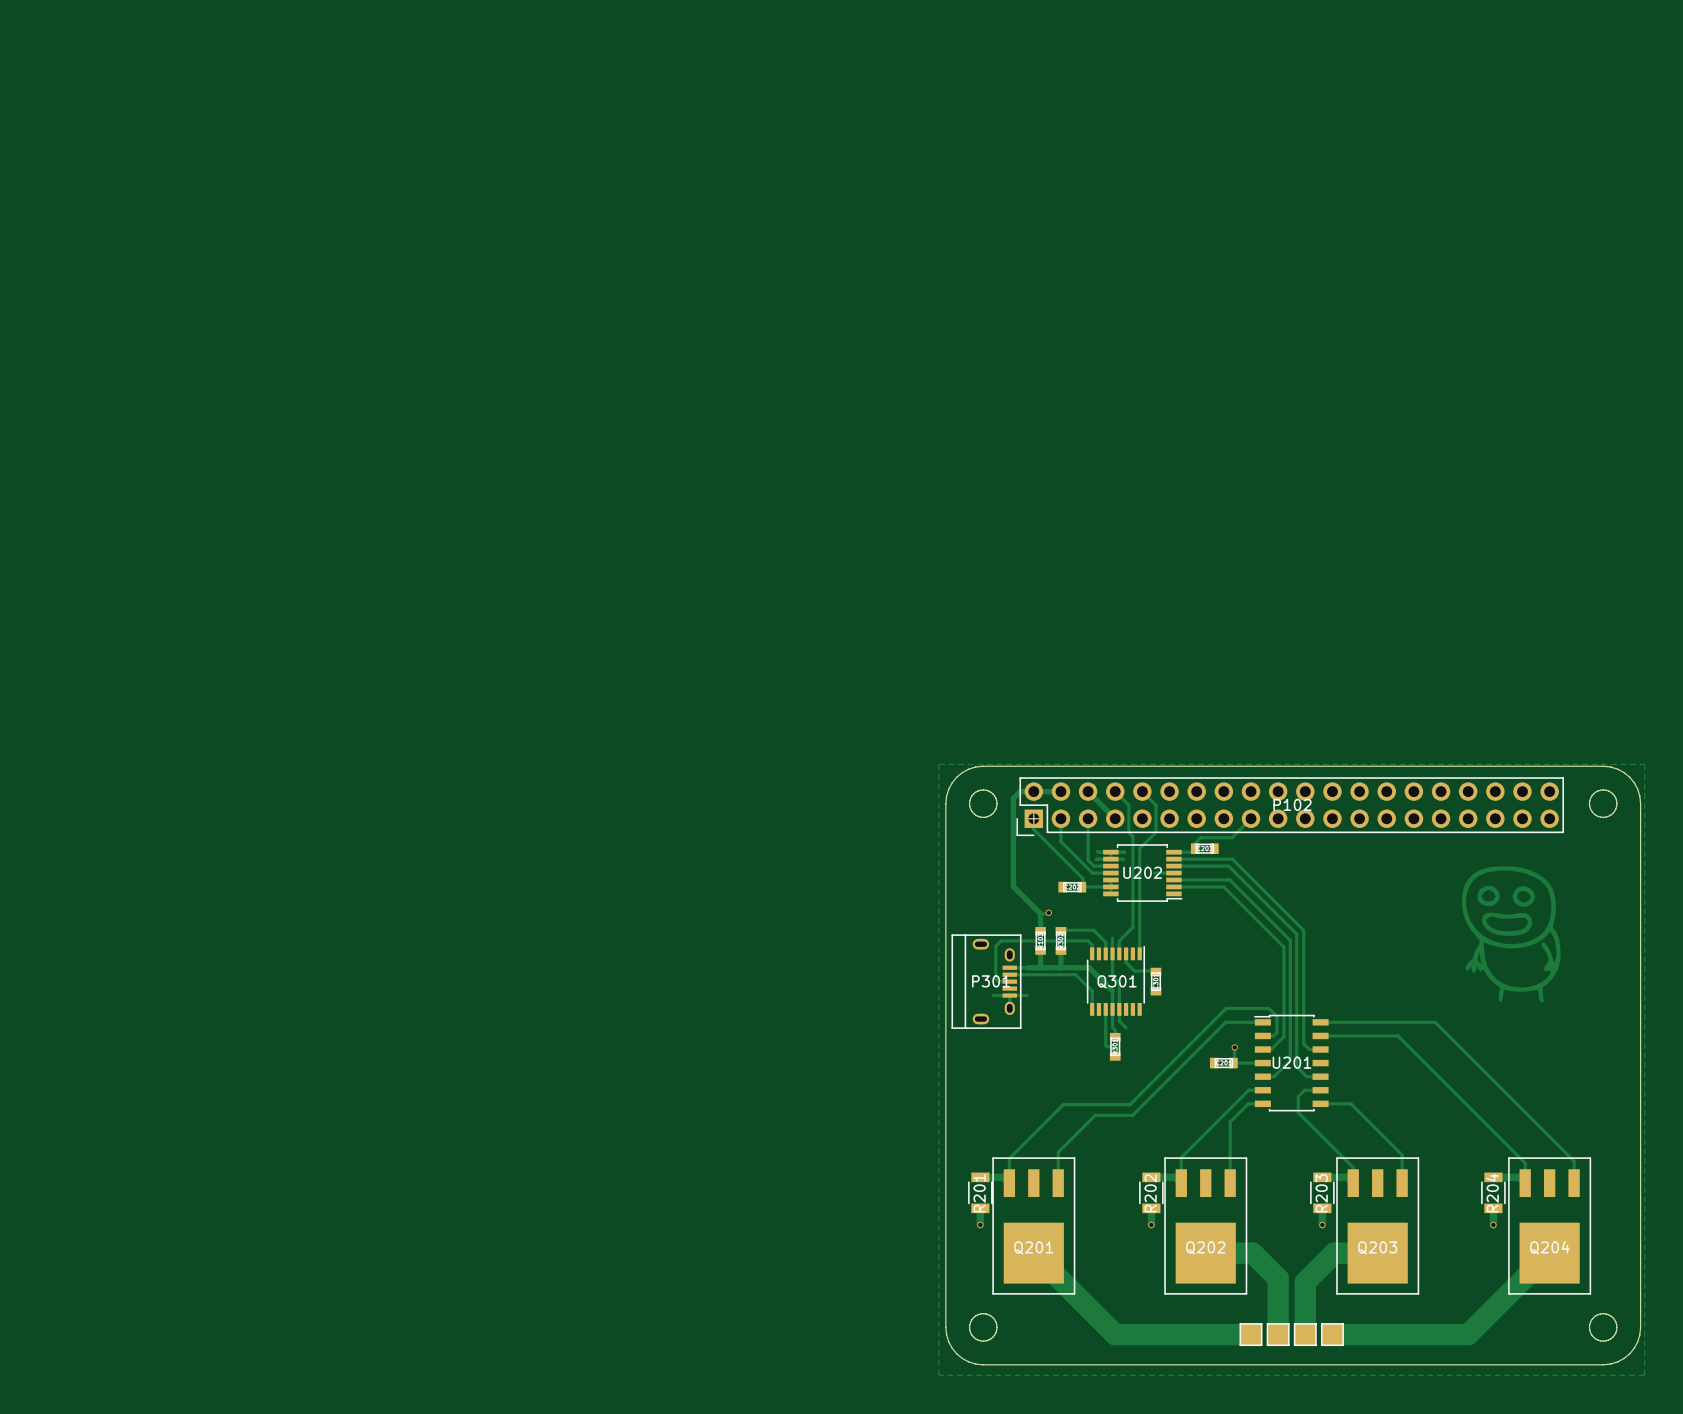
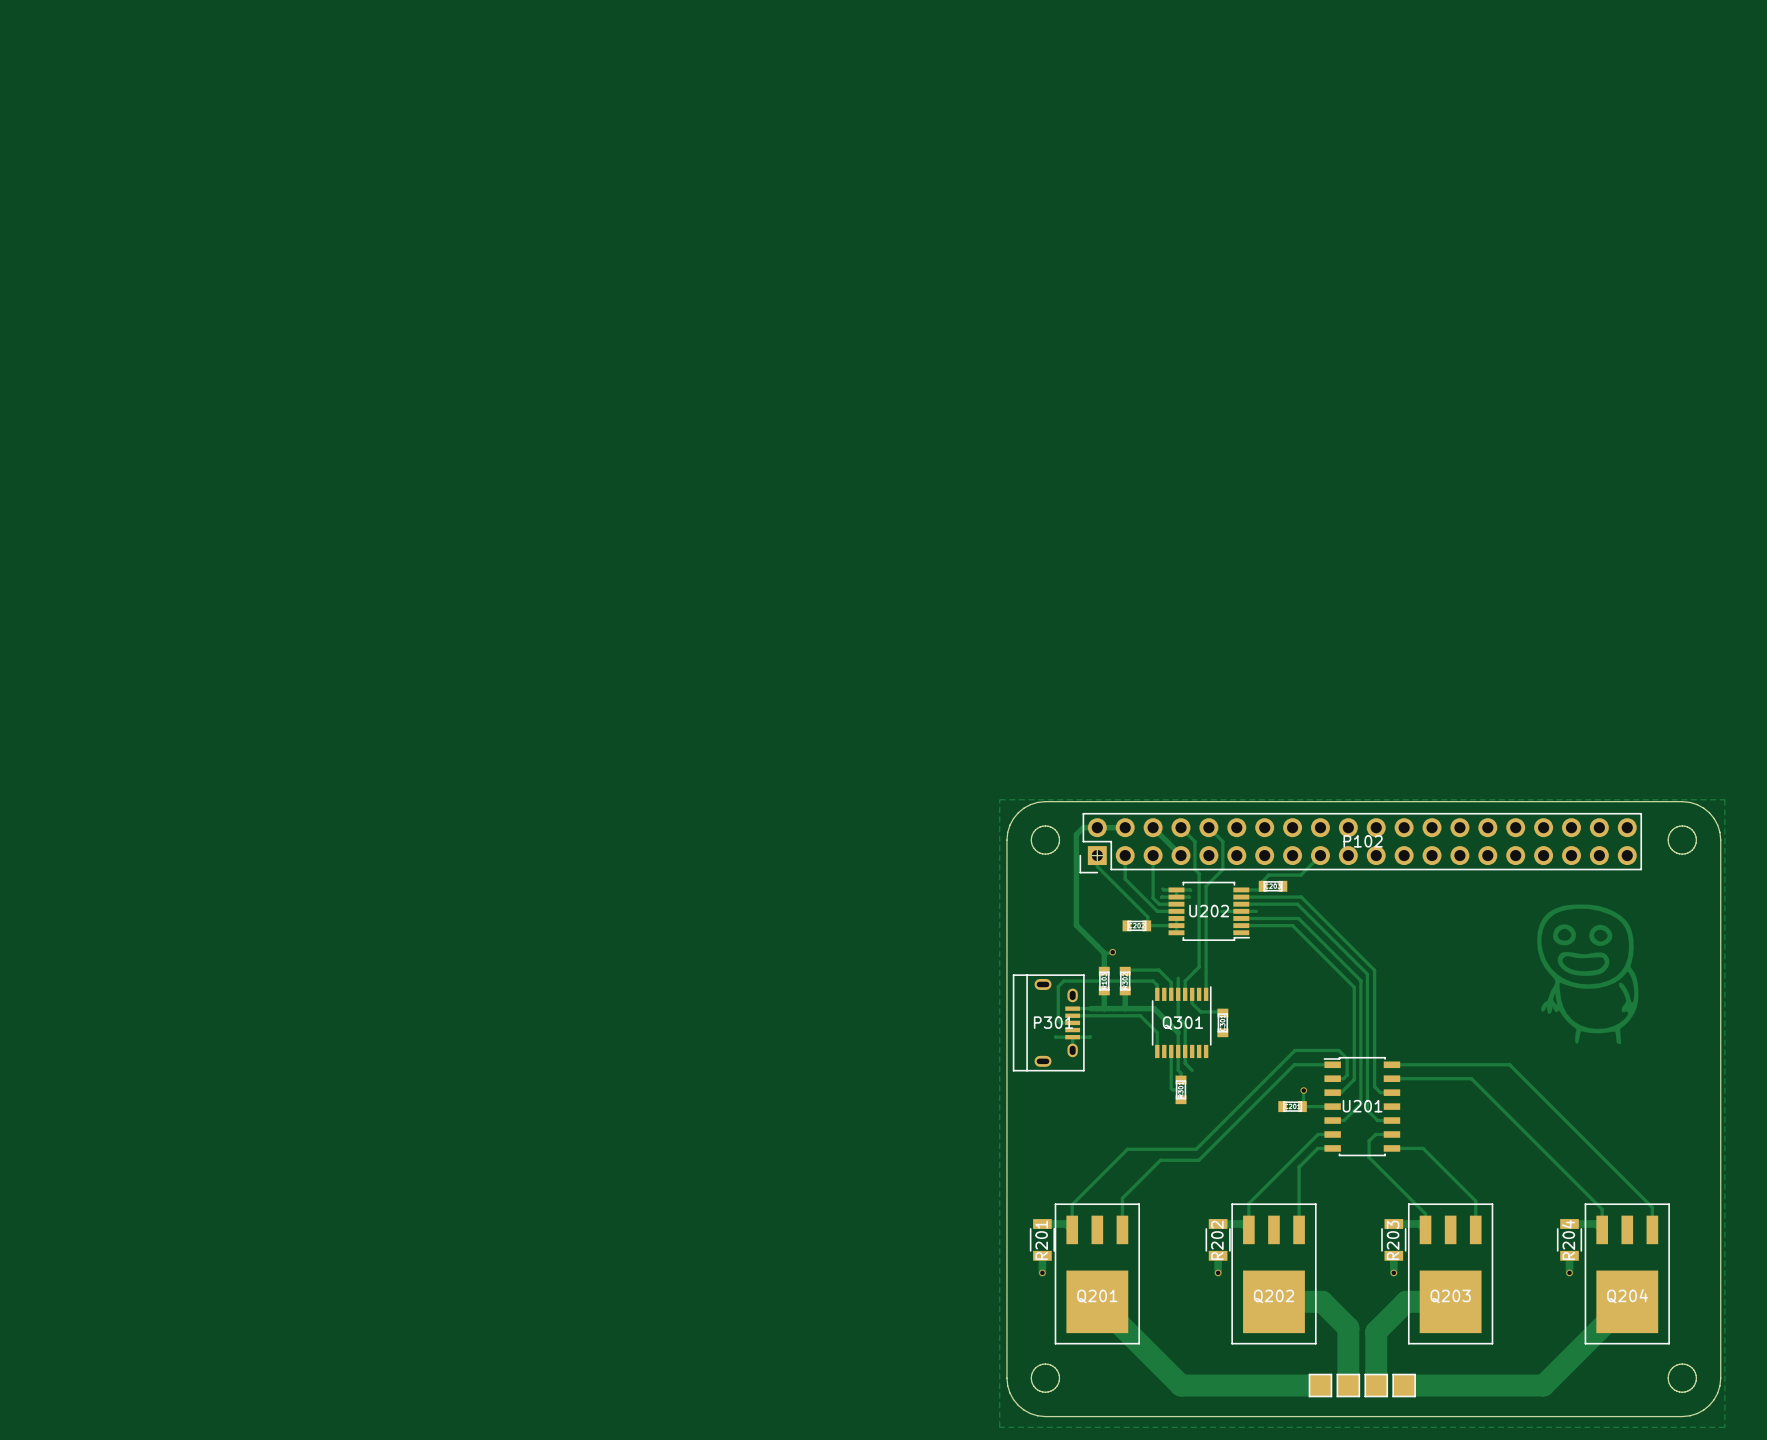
track: none -> (1241, 911) (1256, 911)

